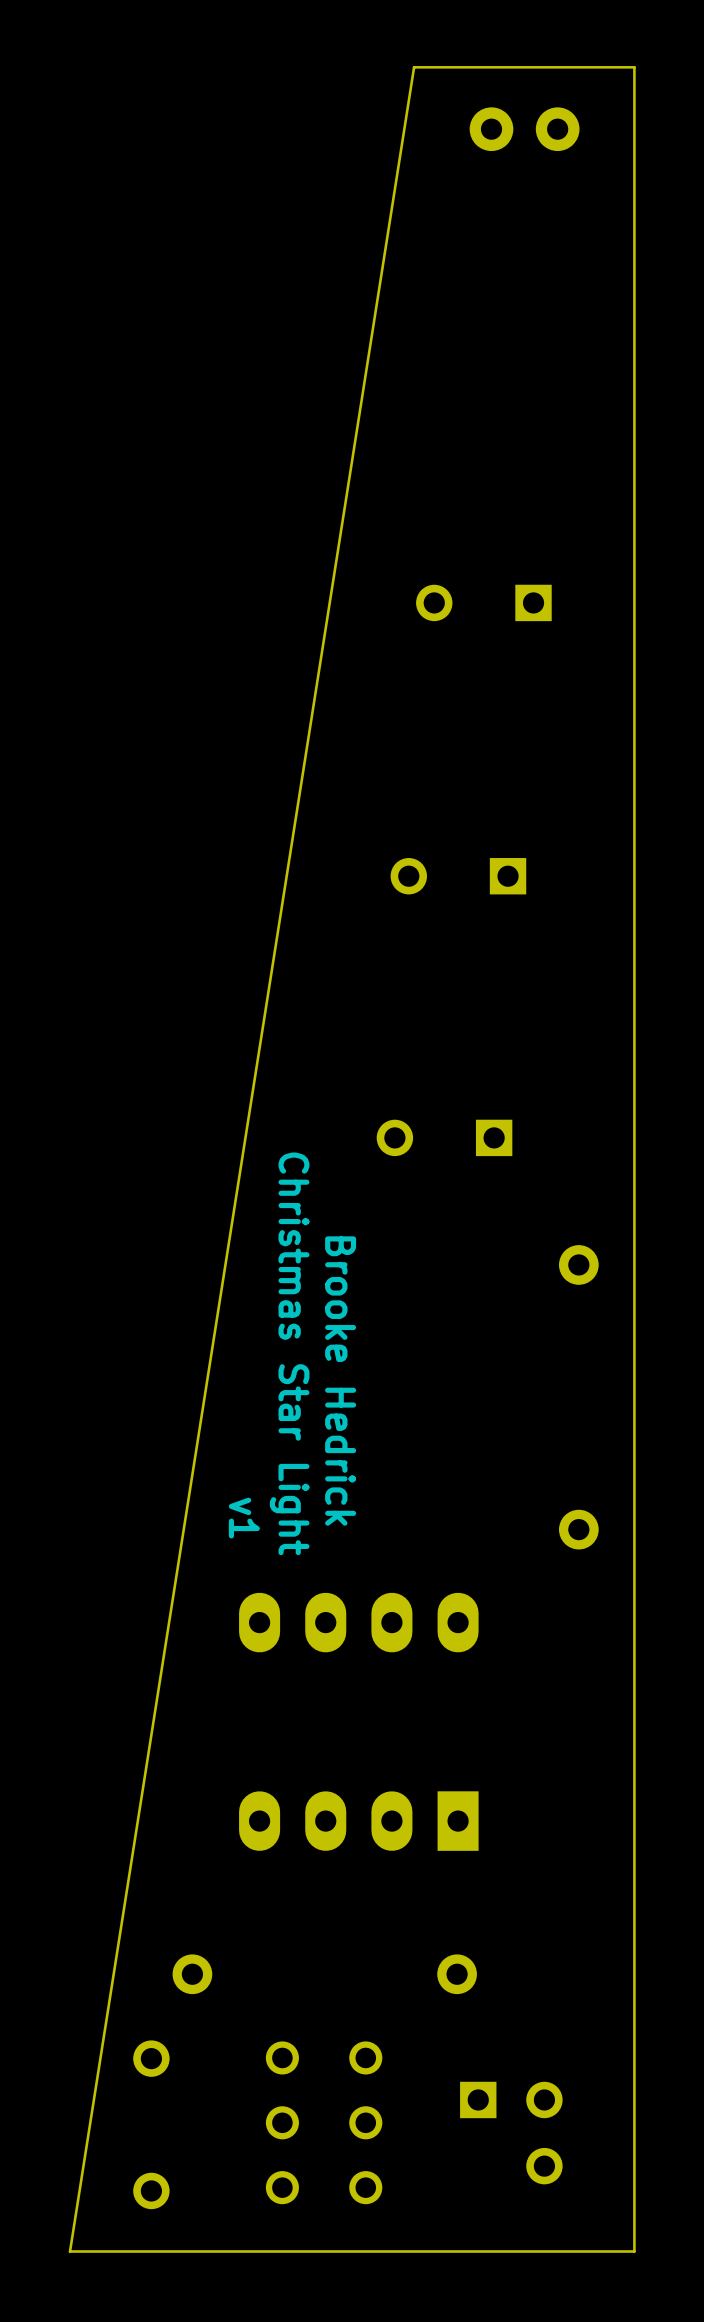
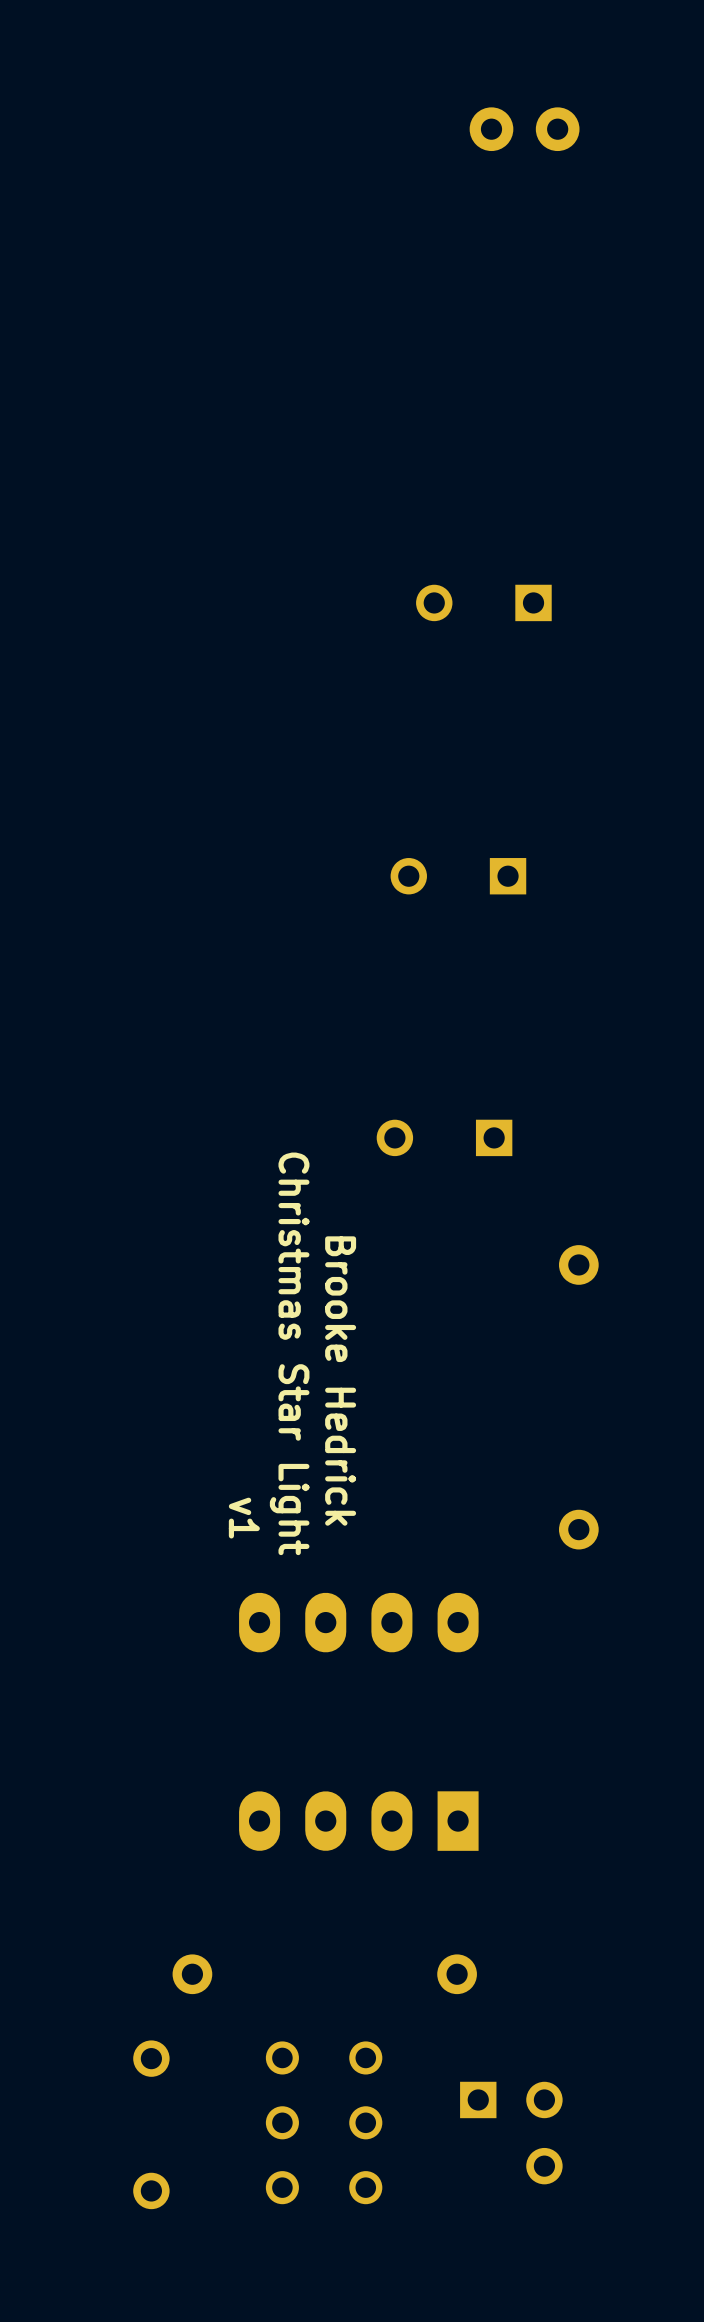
board edge: (634, 67) (634, 2251) (70, 2251) (414, 67) (634, 67) -> none

